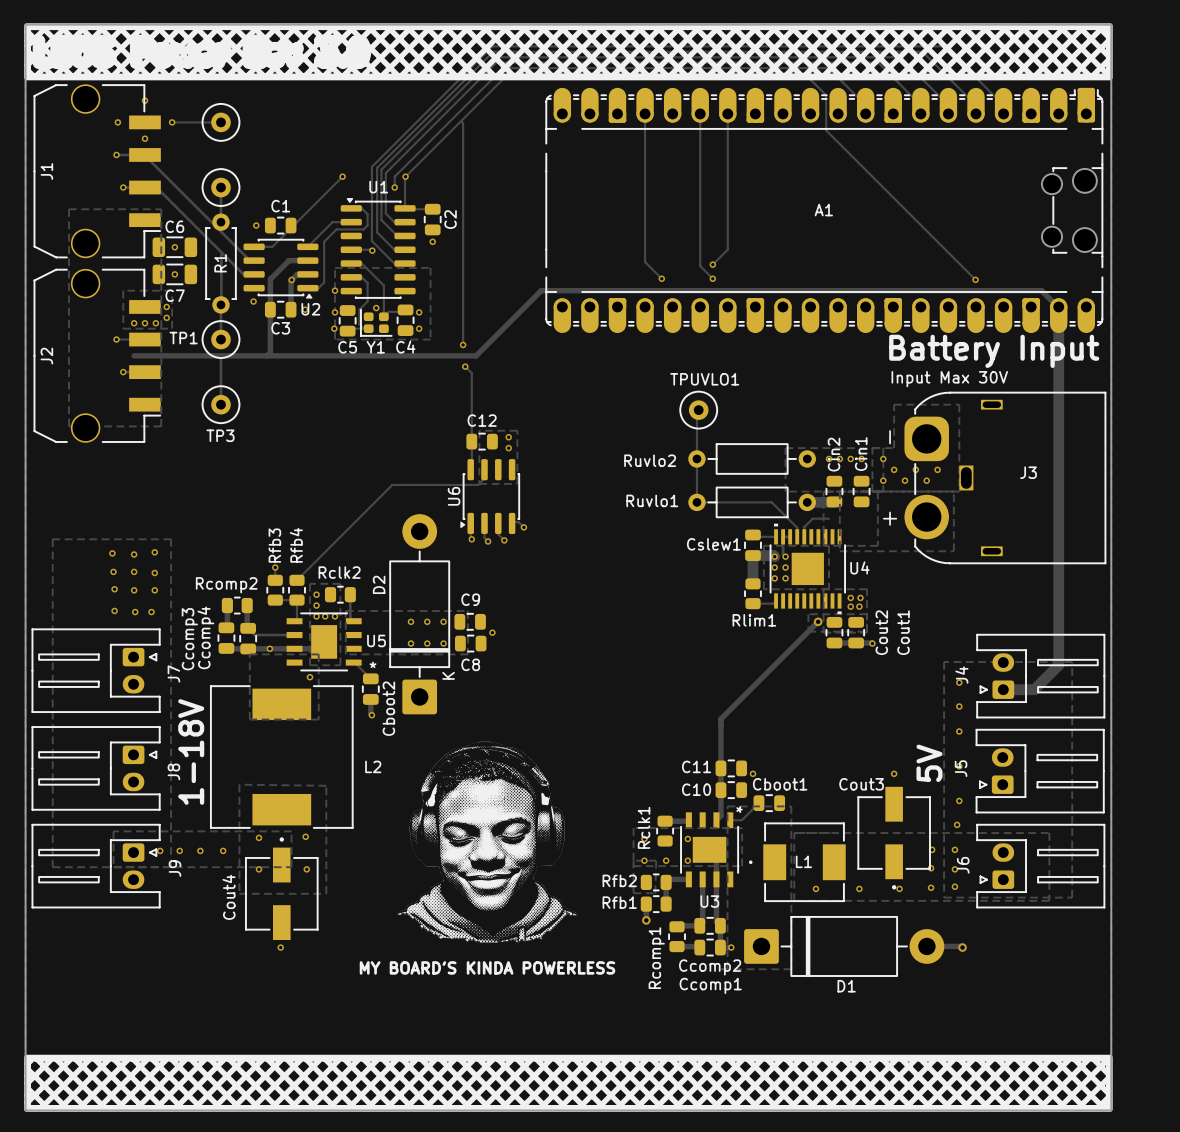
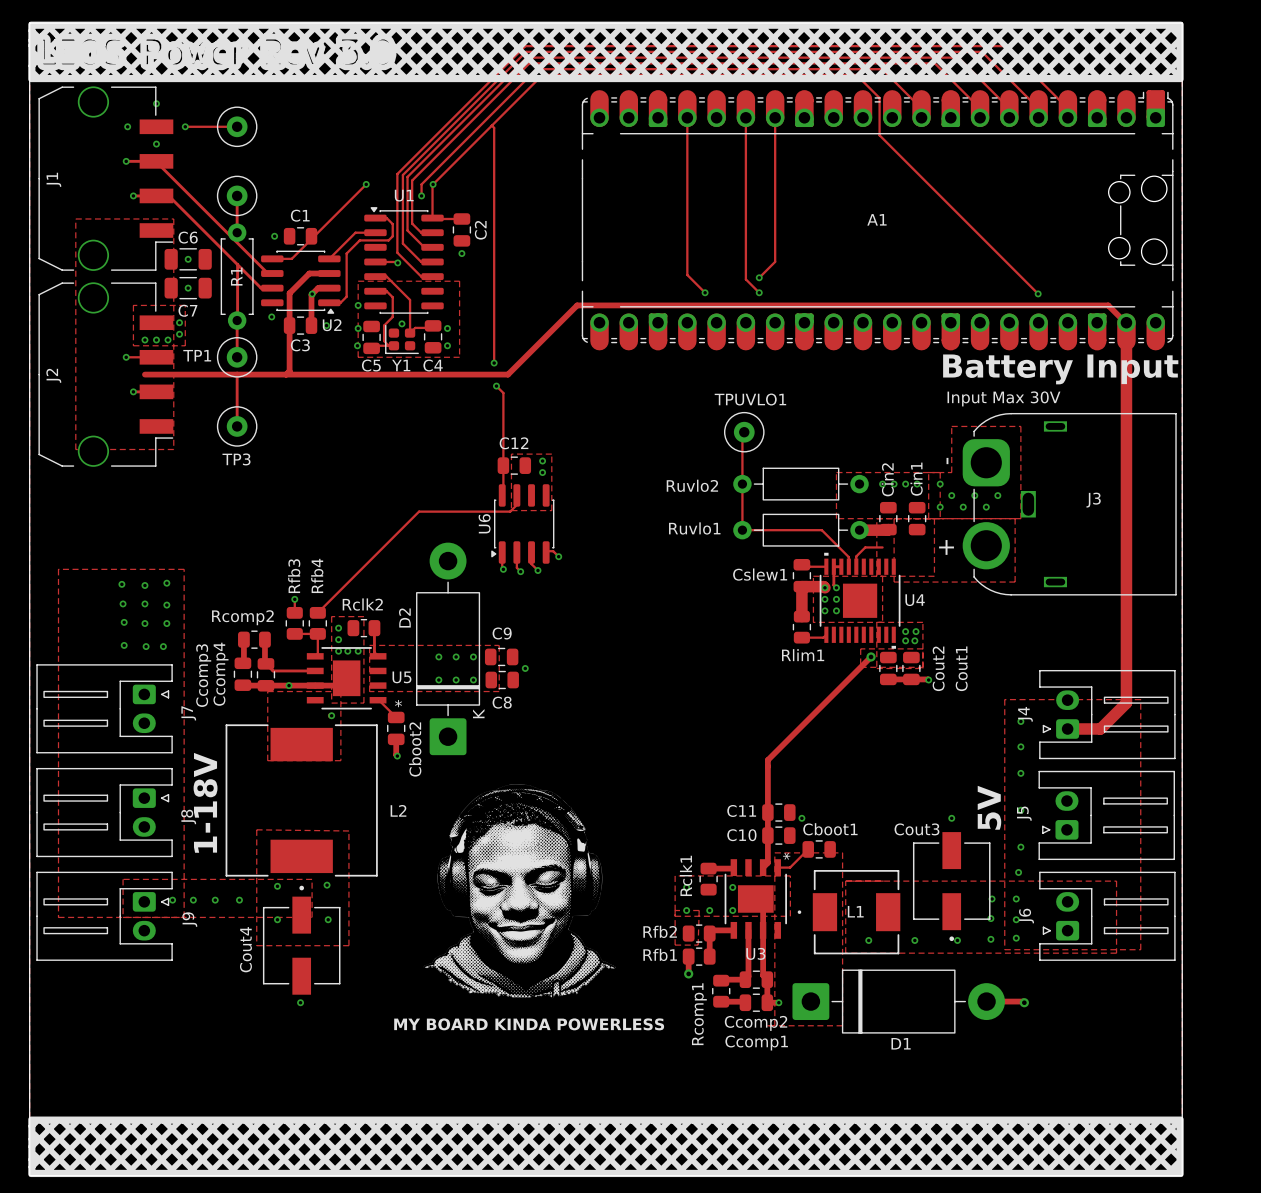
text: MY BOARD'S KINDA POWERLESS (487, 967) -> MY BOARD KINDA POWERLESS (529, 1024)

